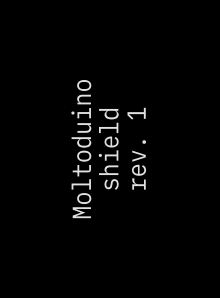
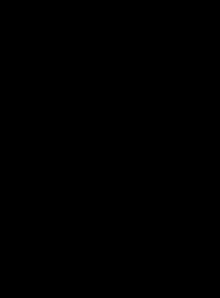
text: rev. 1 (136, 148) -> none
text: Moltoduino (81, 149) -> none
text: shield (108, 149) -> none

